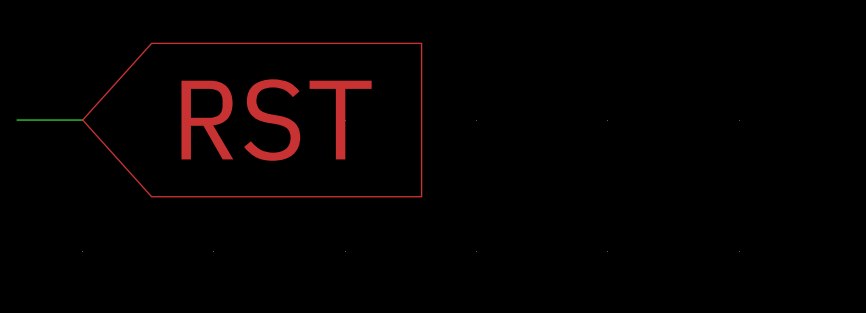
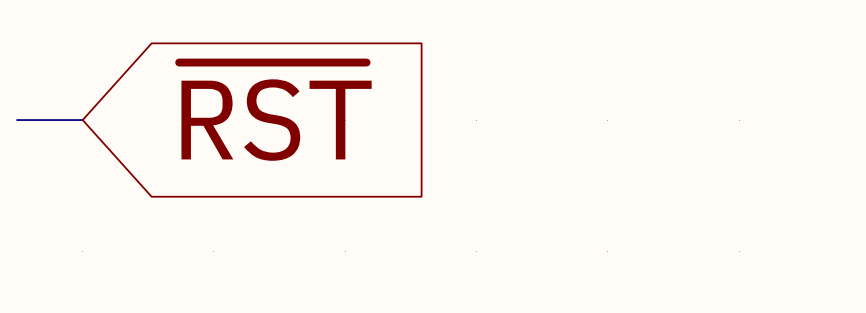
global label: RST (276, 120) -> ~{RST} (275, 111)

